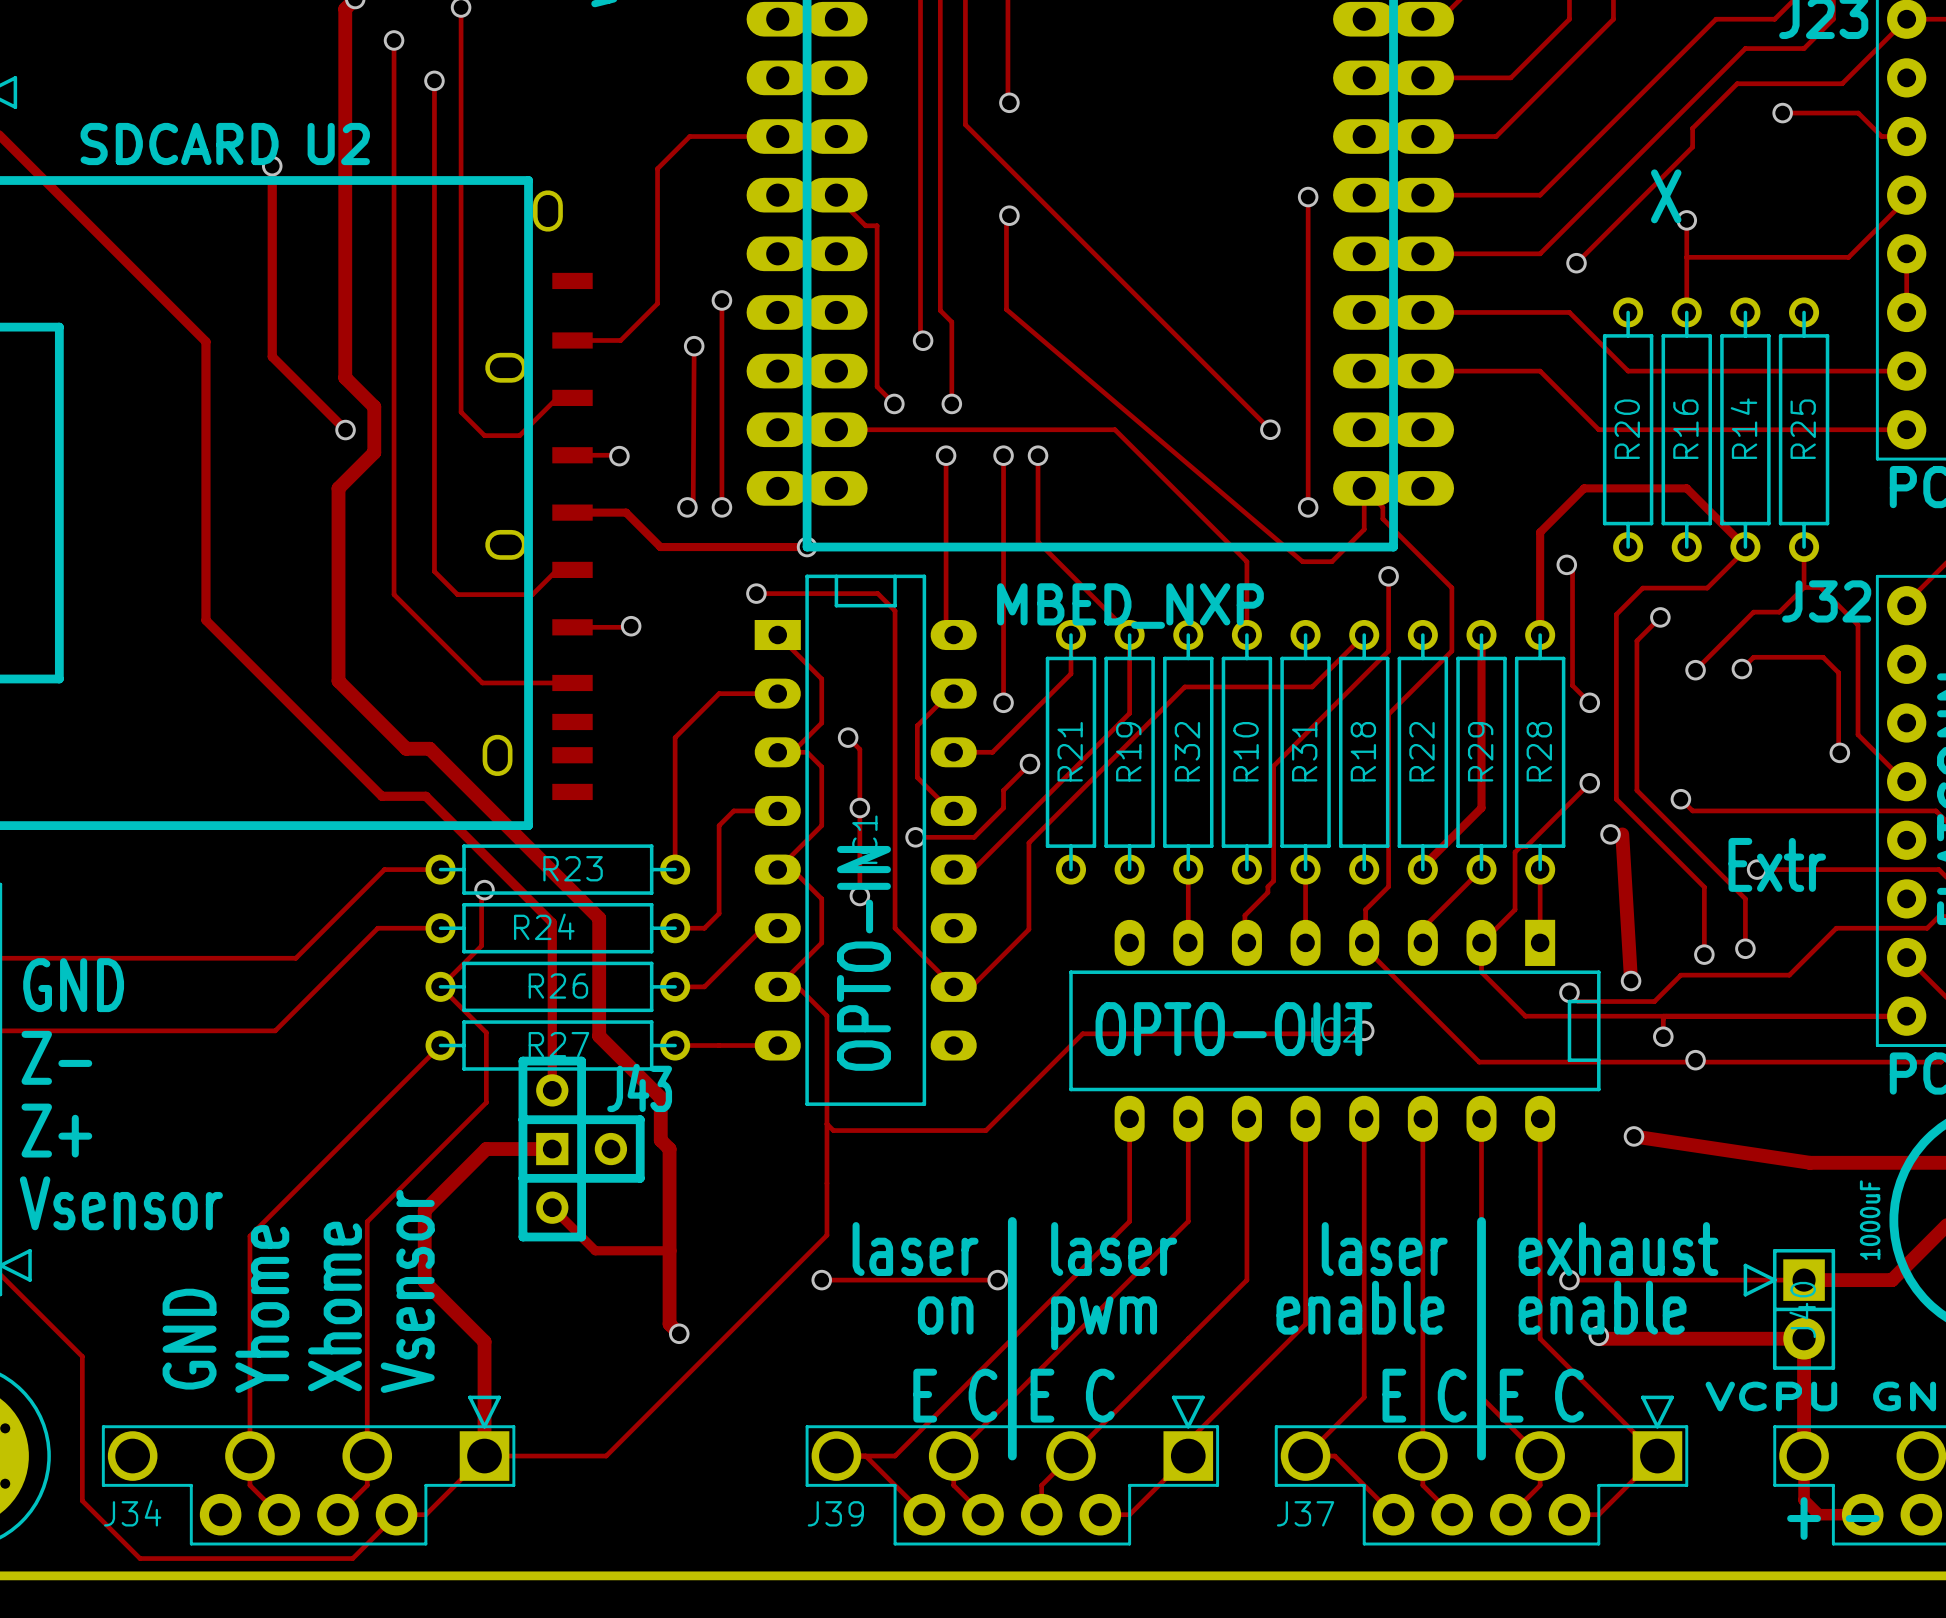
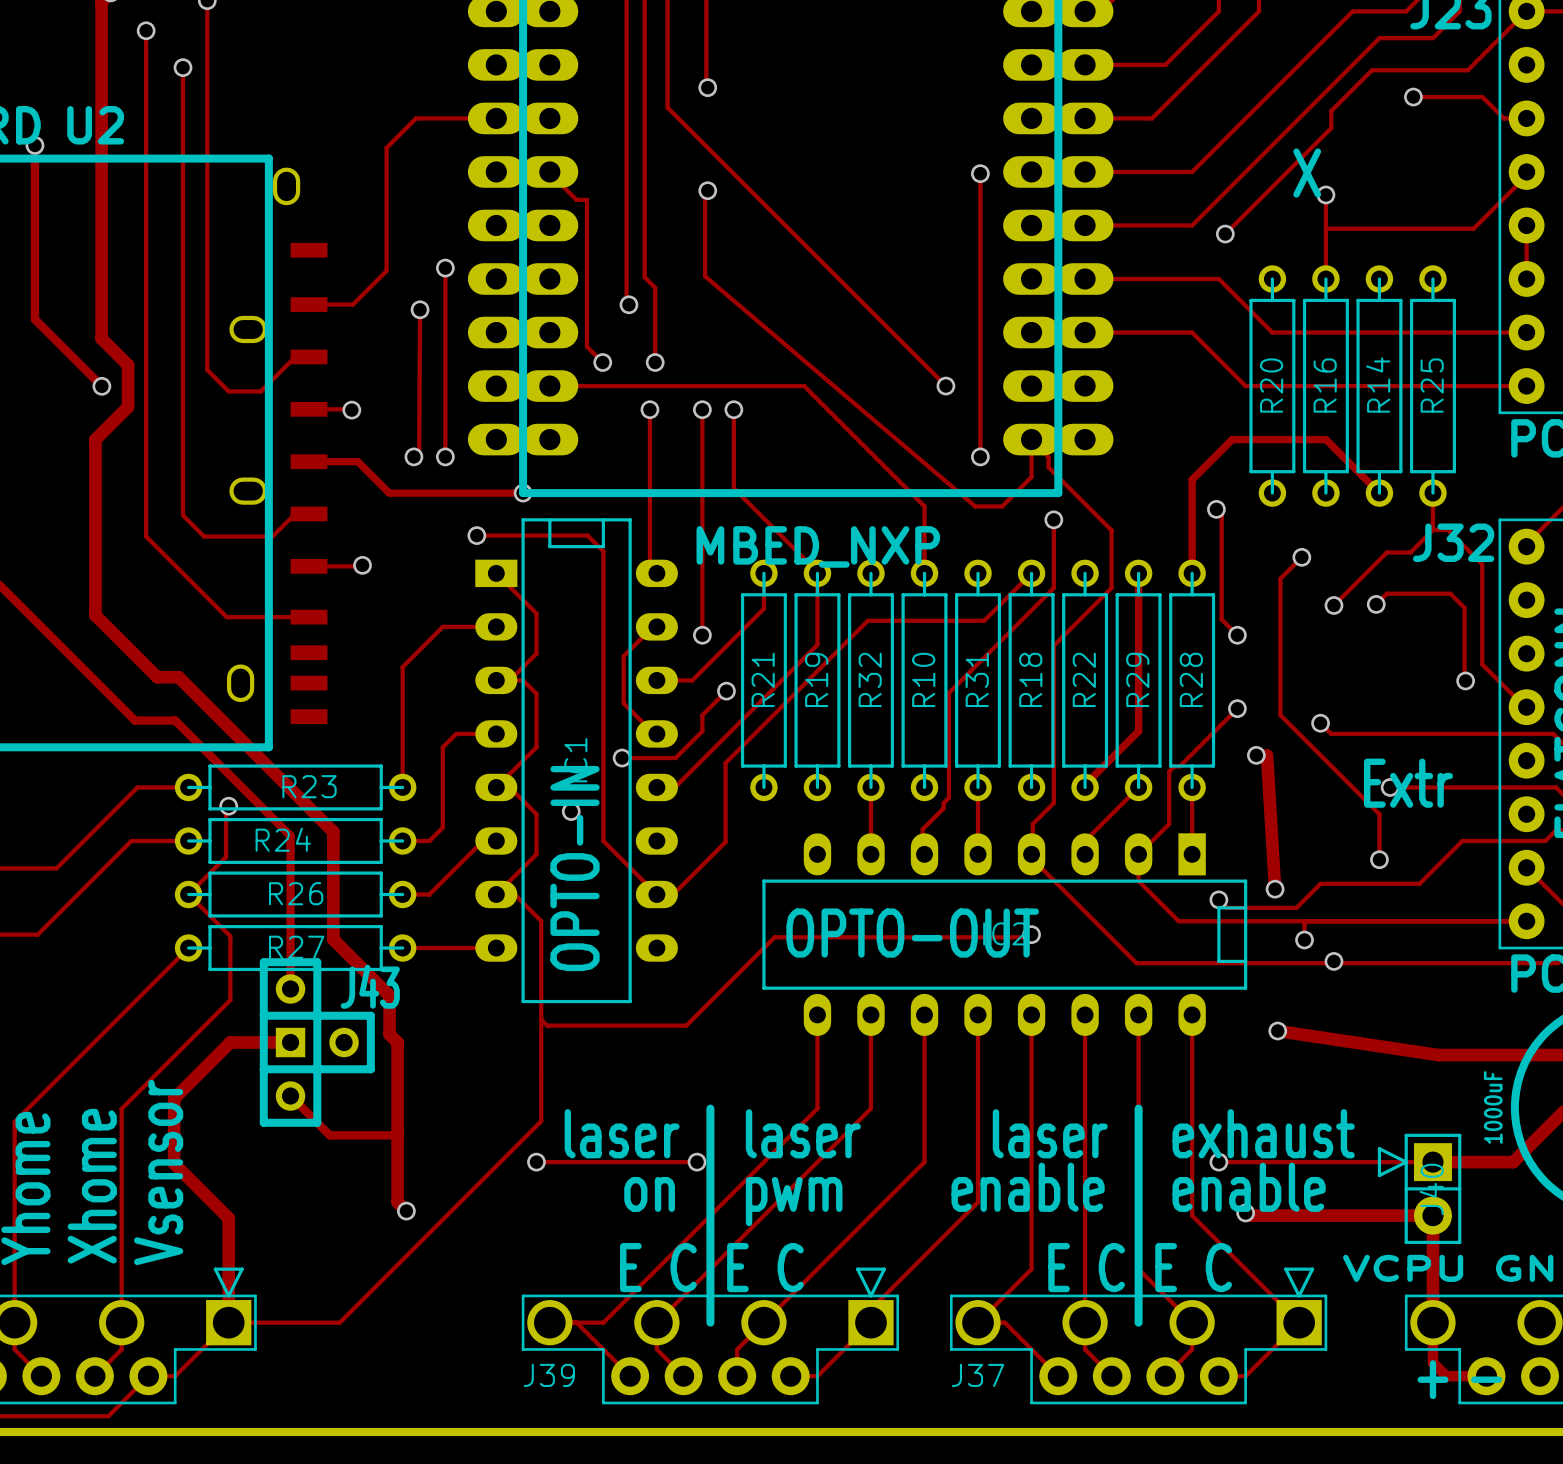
track: (1745, 547) (1745, 549) (1707, 588) (1642, 588) (1616, 614) (1616, 799) (1704, 887) (1704, 954) -> none
track: (848, 737) (859, 749) (859, 895) -> none
via: (848, 737) -> none
via: (859, 808) -> none
via: (1704, 954) -> none

